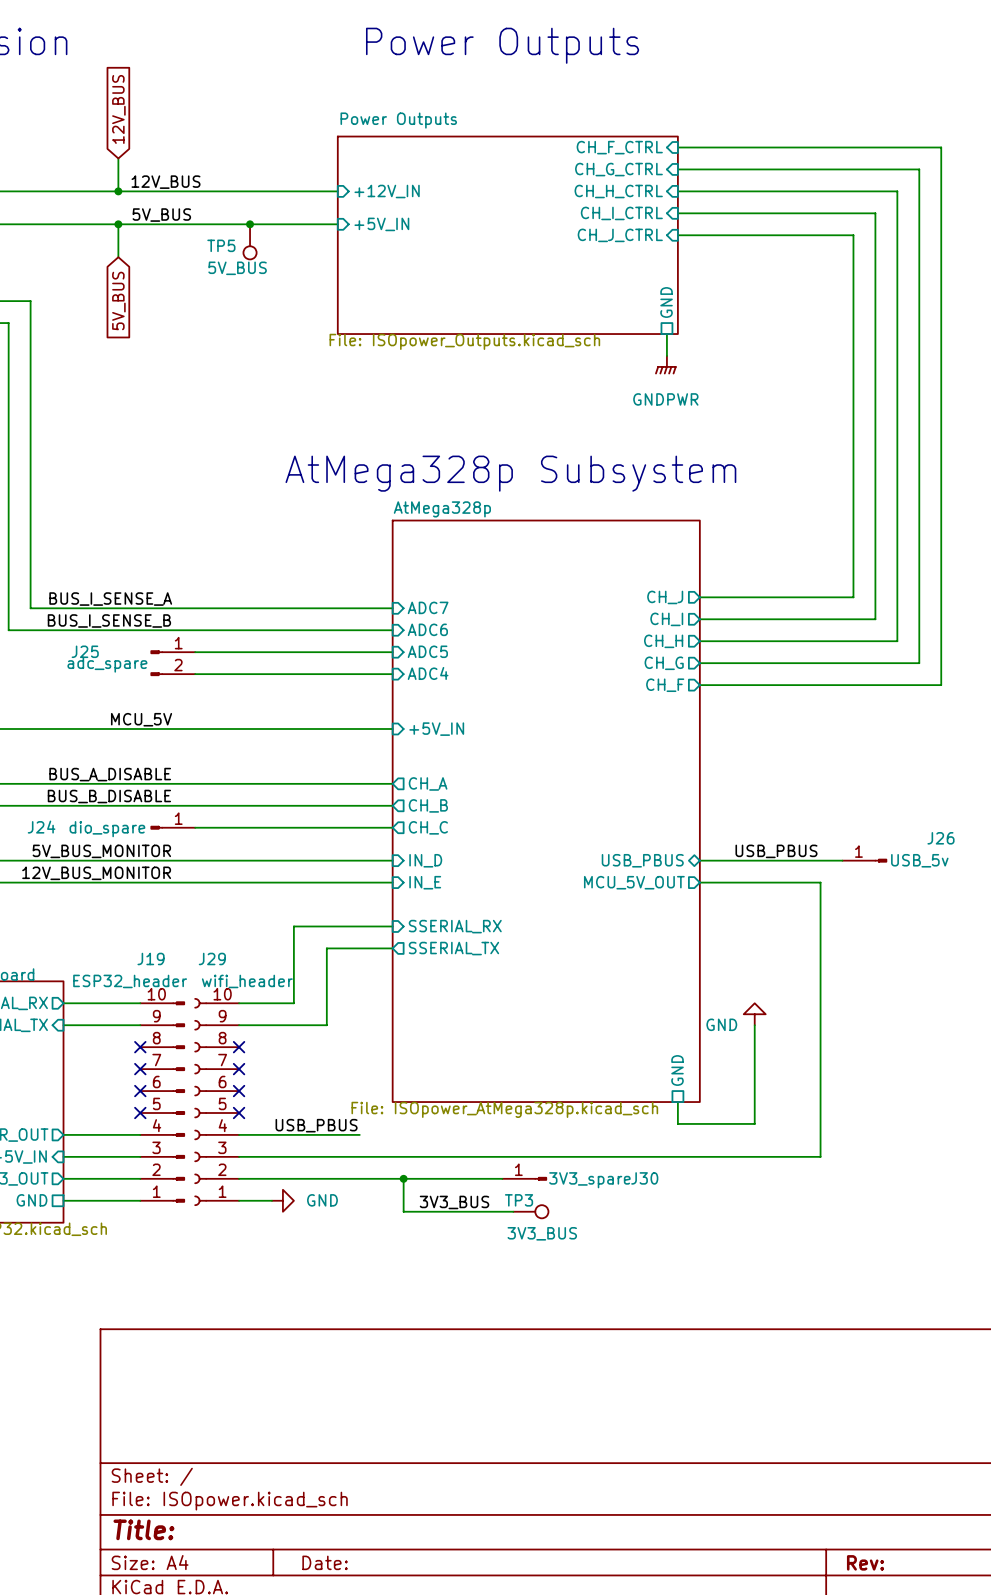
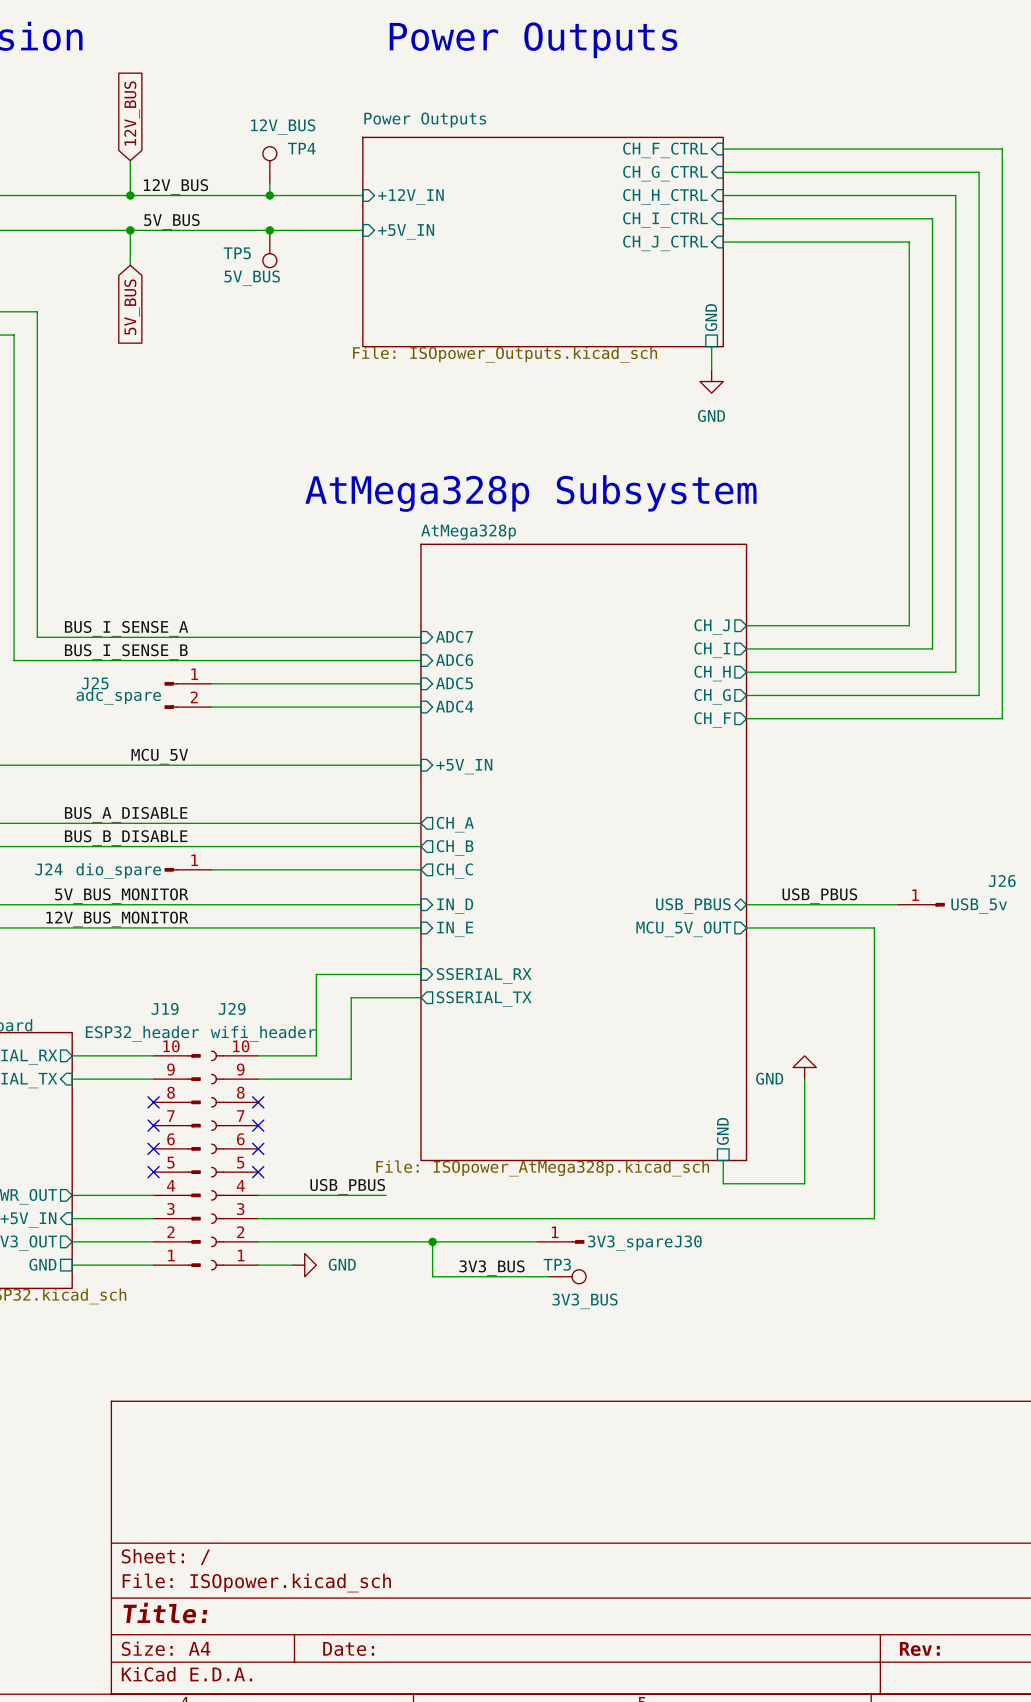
TP4: none -> 12V_BUS (269, 165)
wire: none -> (269, 183) (269, 195)
junction: none -> (269, 195)
power symbol: GNDPWR (665, 365) -> GND (711, 381)

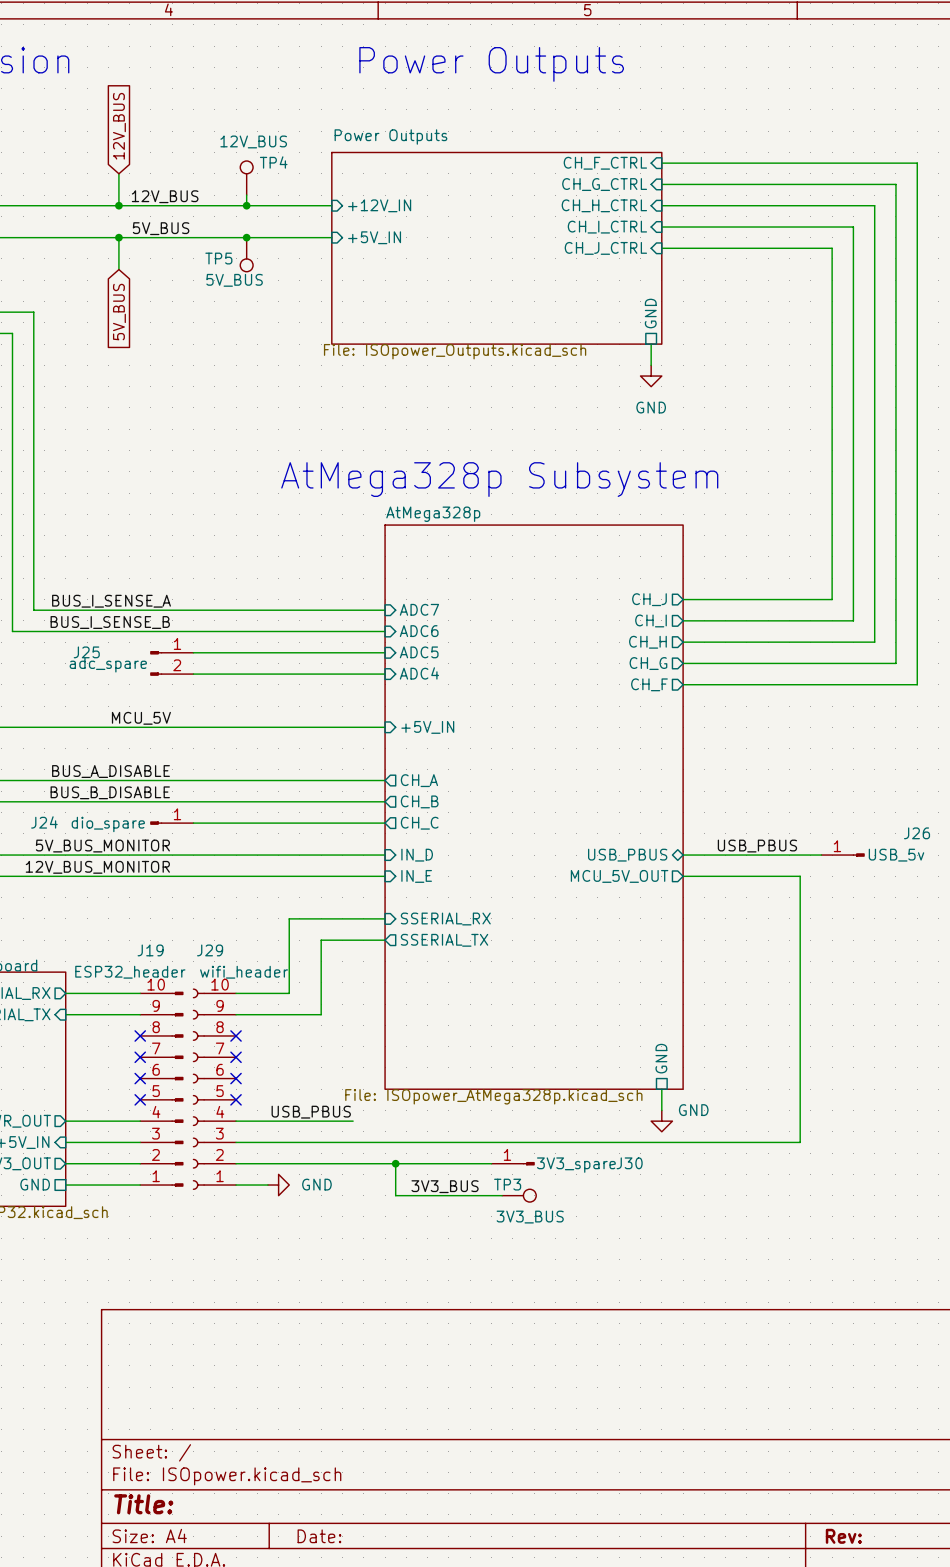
power symbol rotation: 0° (804, 1067) -> 180° (661, 1121)
power symbol position: GND (804, 1067) -> GND (661, 1121)
wire: (804, 1079) (804, 1183) (723, 1183) -> none

